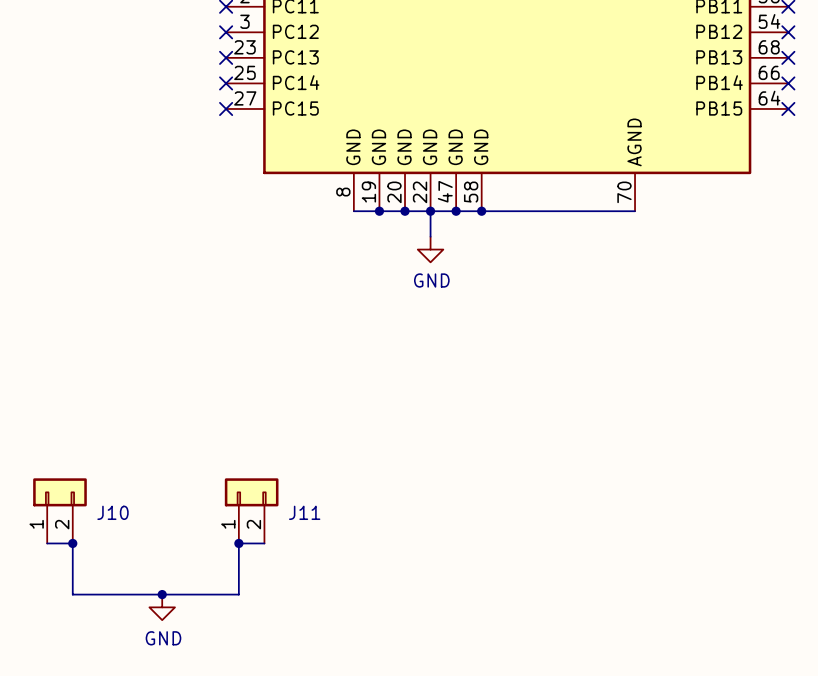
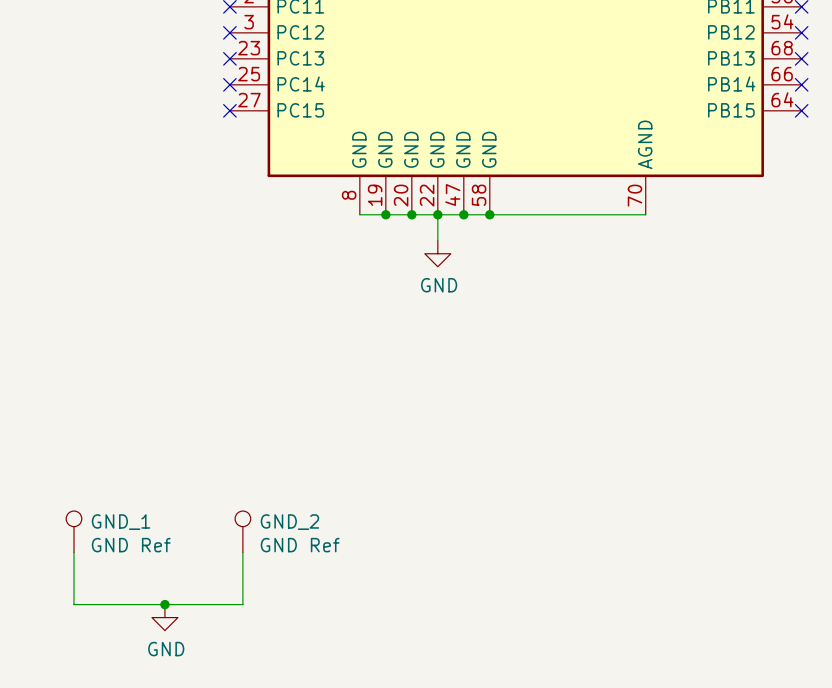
J10: (59, 510) -> none
J11: (251, 510) -> none
GND_1: none -> GND Ref (73, 531)
GND_2: none -> GND Ref (242, 531)
wire: (47, 543) (72, 543) -> none
junction: (72, 543) -> none
wire: (238, 543) (264, 543) -> none
junction: (238, 543) -> none

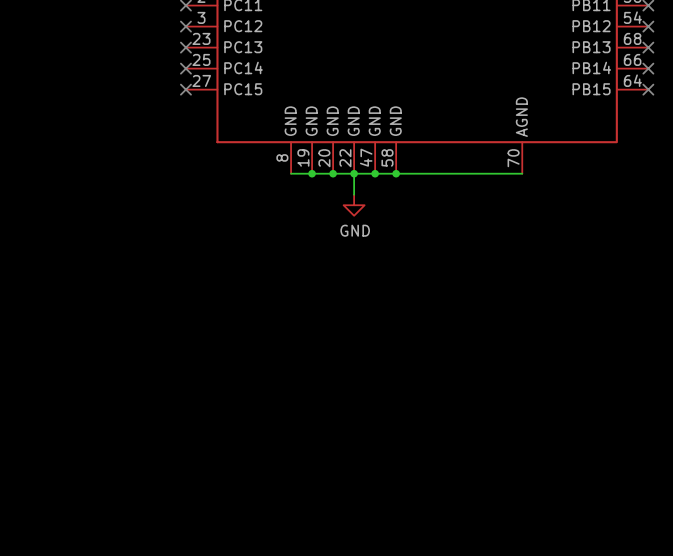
GND_1: GND Ref (73, 531) -> none
GND_2: GND Ref (242, 531) -> none
wire: (73, 552) (73, 604) (242, 604) (242, 552) -> none
junction: (164, 604) -> none
power symbol: GND (164, 617) -> none

